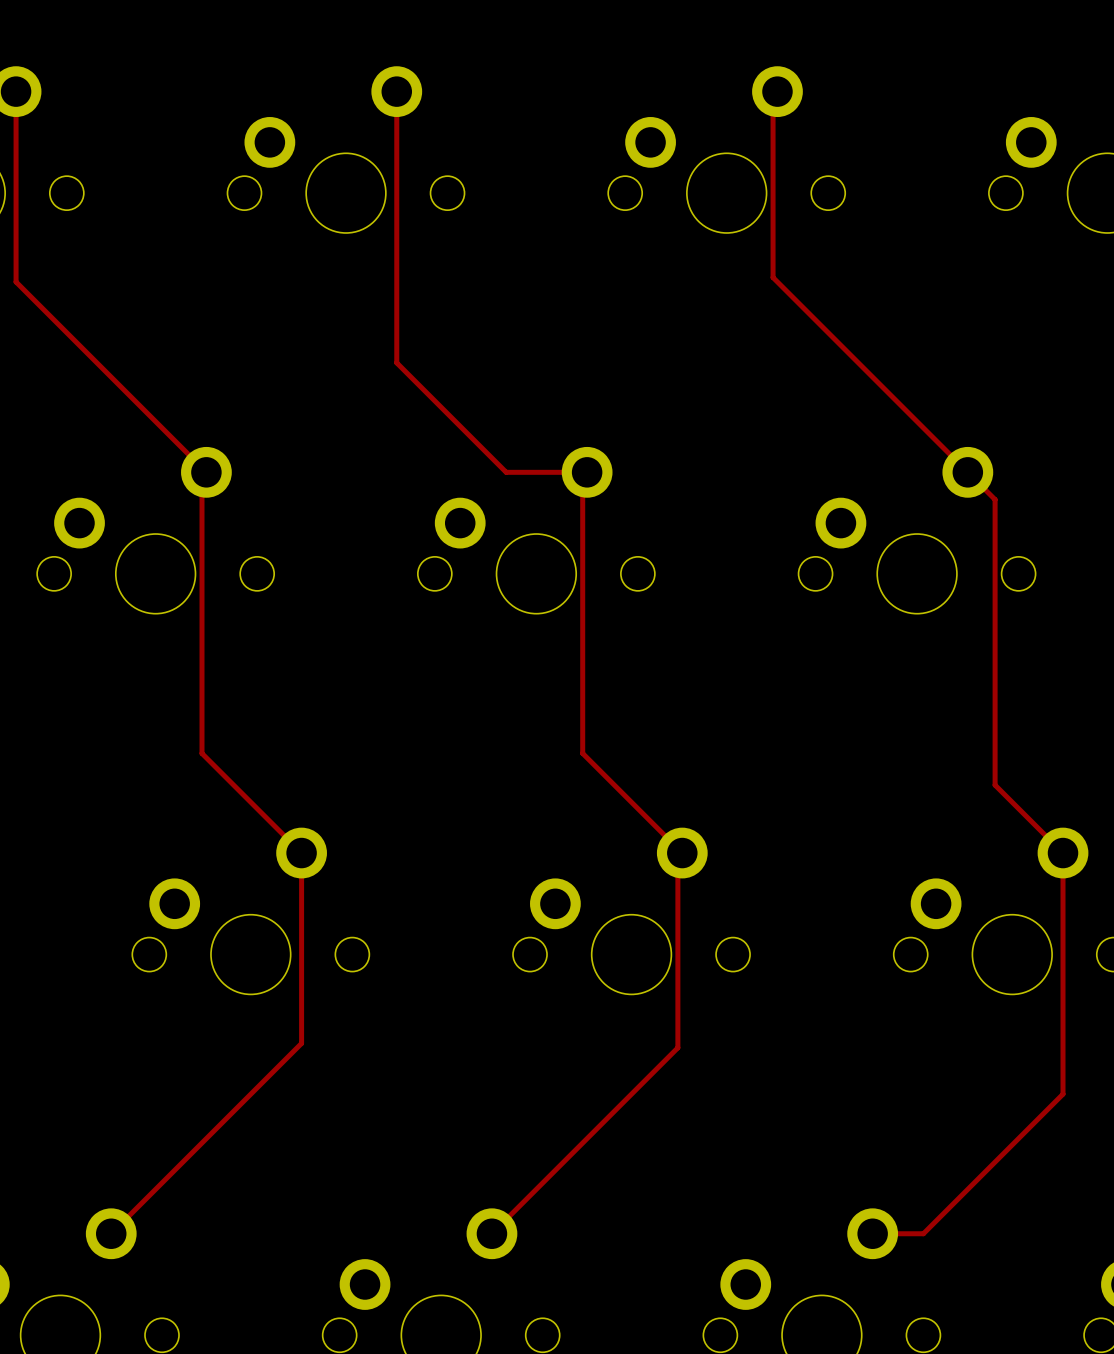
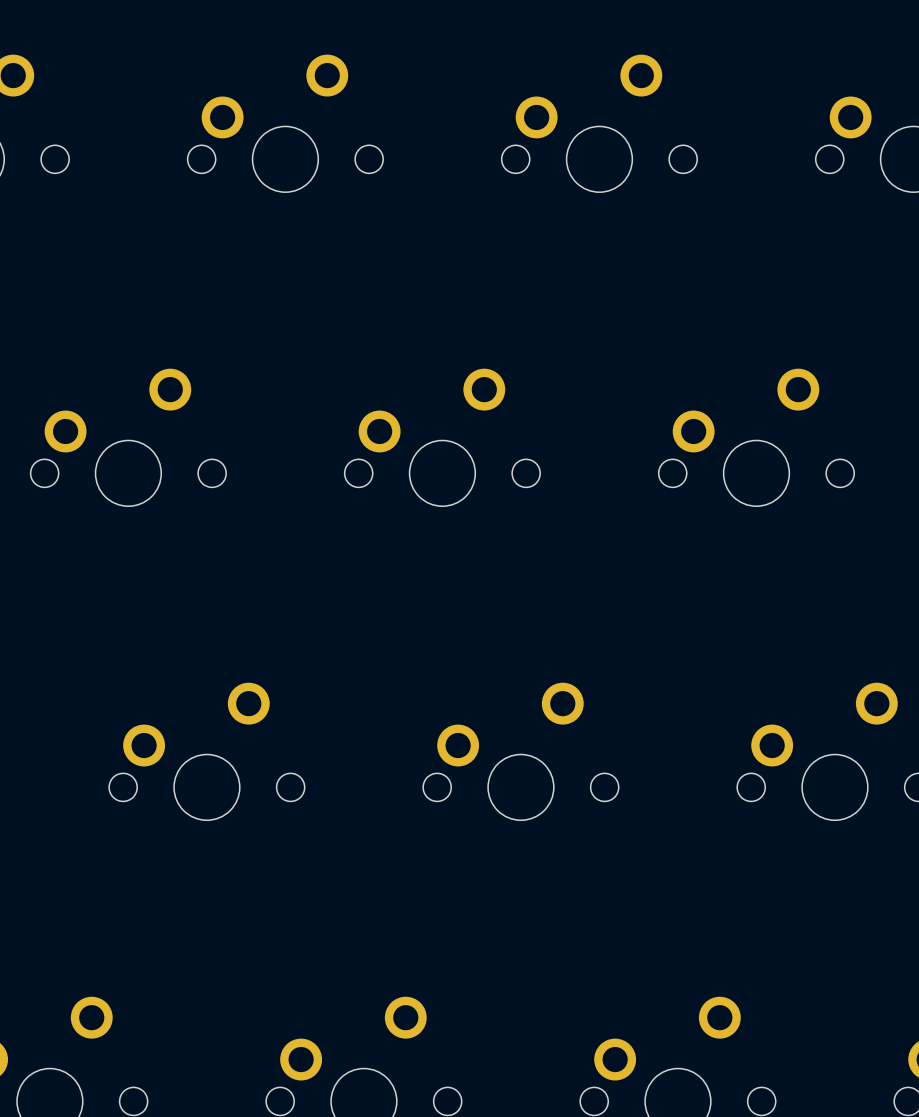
track: (16, 91) (16, 281) (206, 472) (202, 476) (202, 753) (301, 853) (301, 1043) (111, 1233) -> none
track: (396, 91) (396, 362) (506, 472) (587, 472) (582, 476) (582, 753) (682, 853) (677, 857) (677, 1047) (491, 1233) -> none
track: (777, 91) (773, 96) (773, 277) (995, 499) (995, 785) (1063, 853) (1063, 1094) (923, 1233) (872, 1233) -> none

